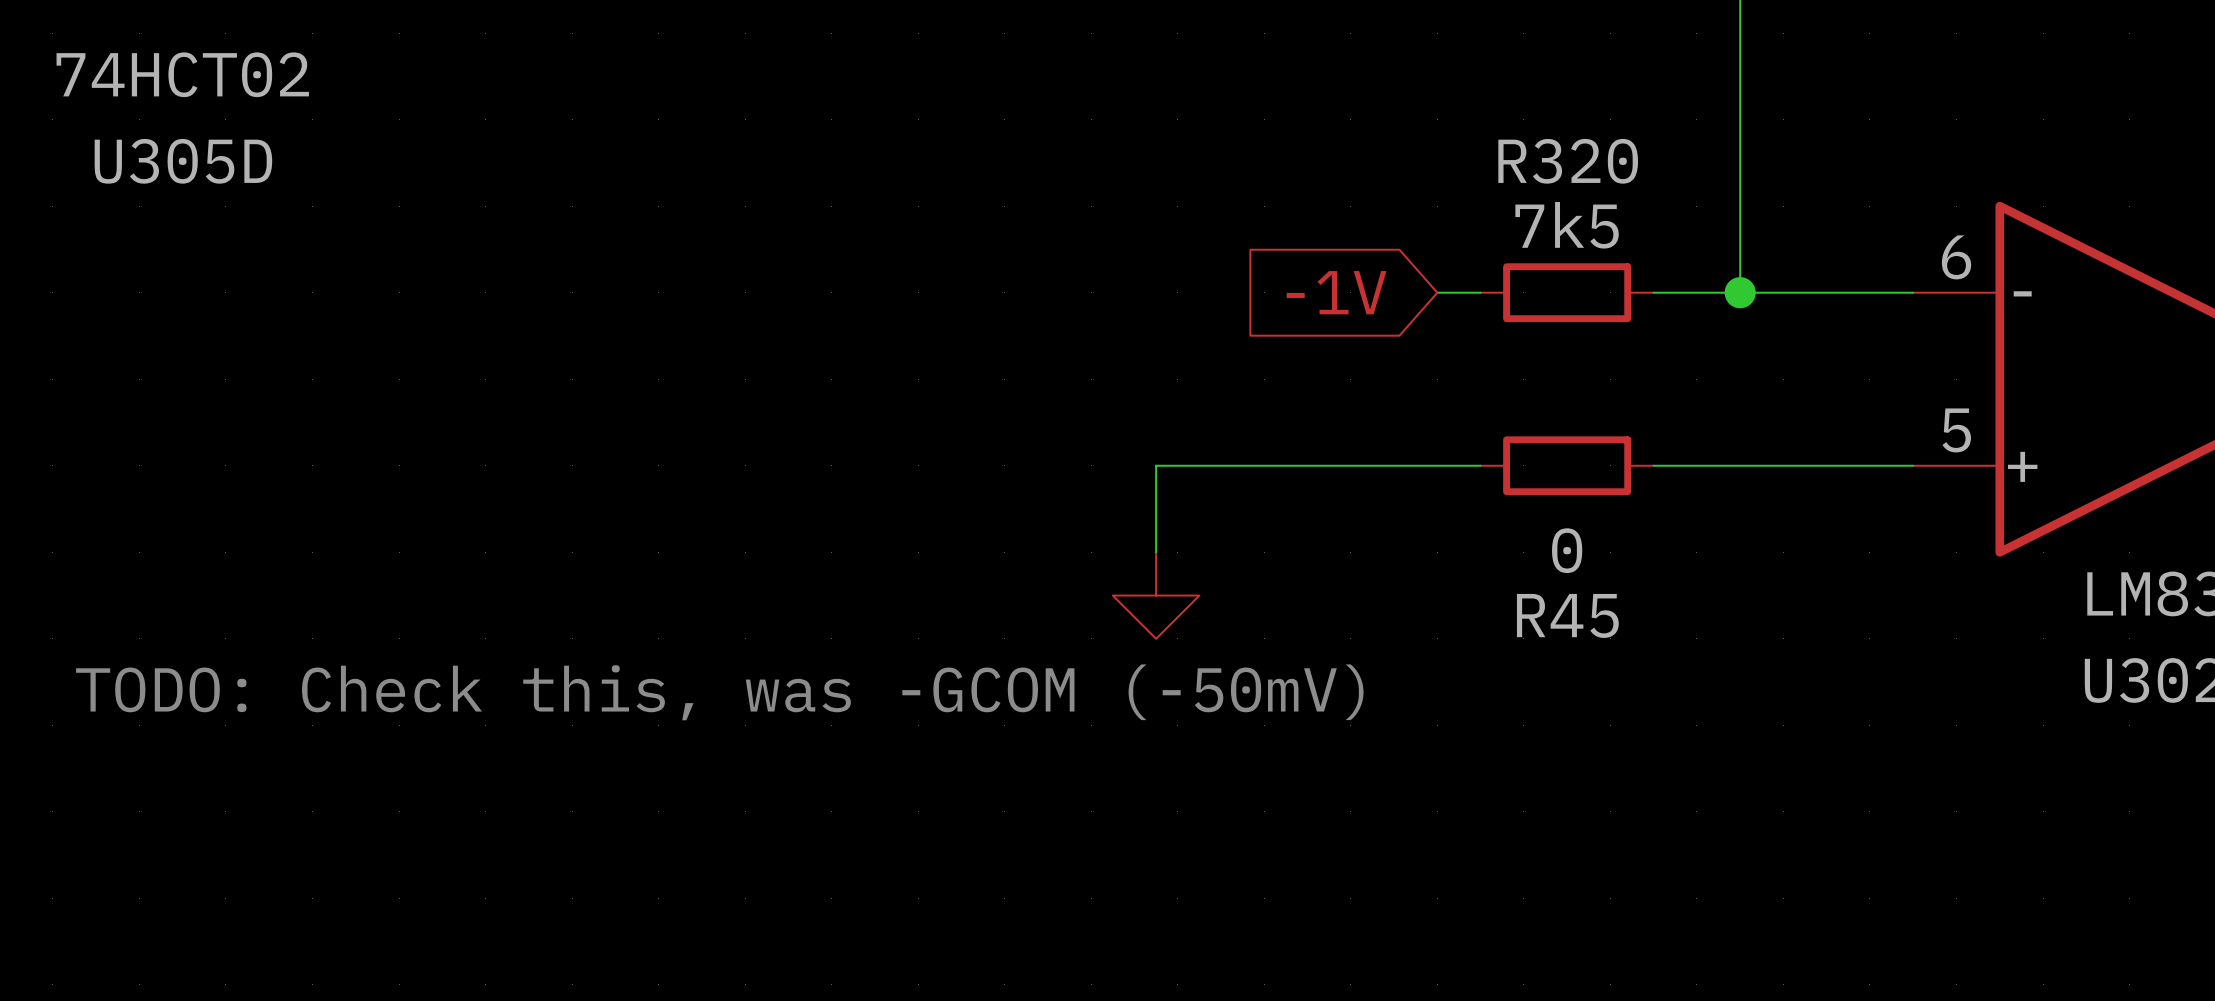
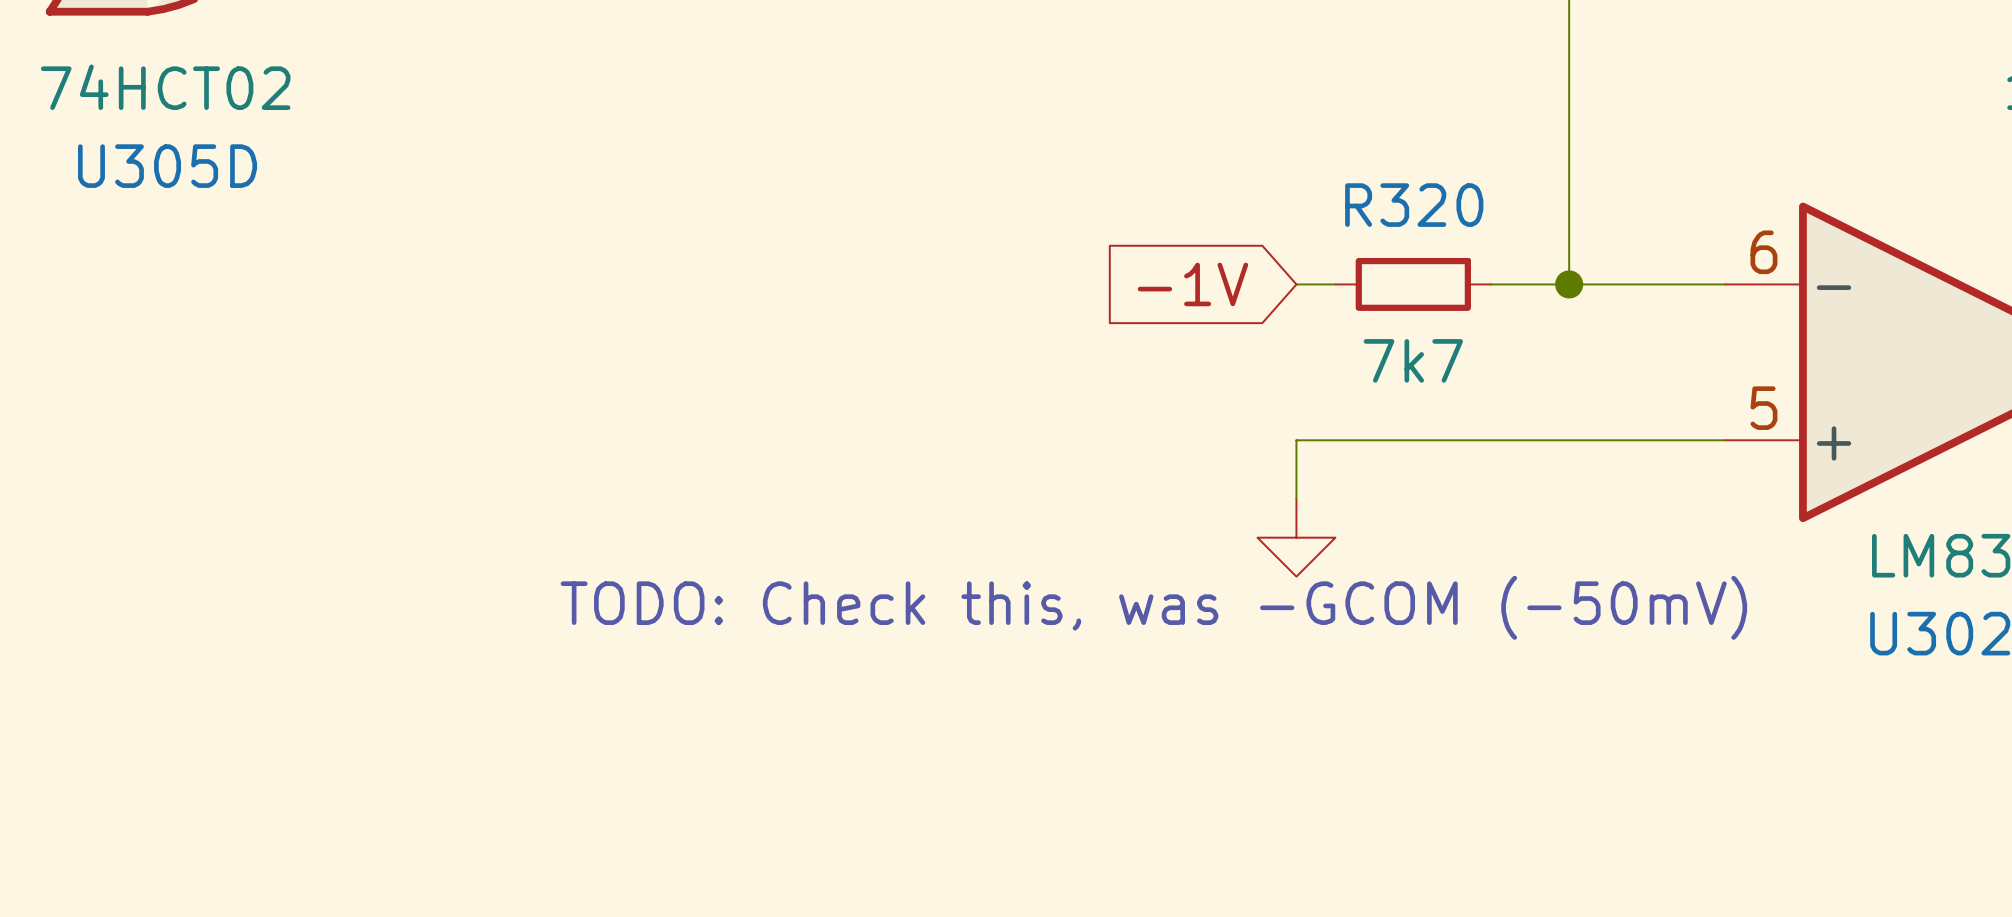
R320 name position: R320 (1568, 161) -> R320 (1414, 205)
R320 value: 7k5 (1567, 225) -> 7k7 (1413, 360)
wire: (1437, 465) (1156, 465) (1156, 552) -> (1296, 440) (1296, 498)
wire: none -> (1335, 440) (1491, 440)
R45: 0 (1567, 465) -> none
power symbol position: (1156, 595) -> (1296, 537)
text position: TODO: Check this, was -GCOM (-50mV) (719, 692) -> TODO: Check this, was -GCOM (-50mV) (1153, 607)

